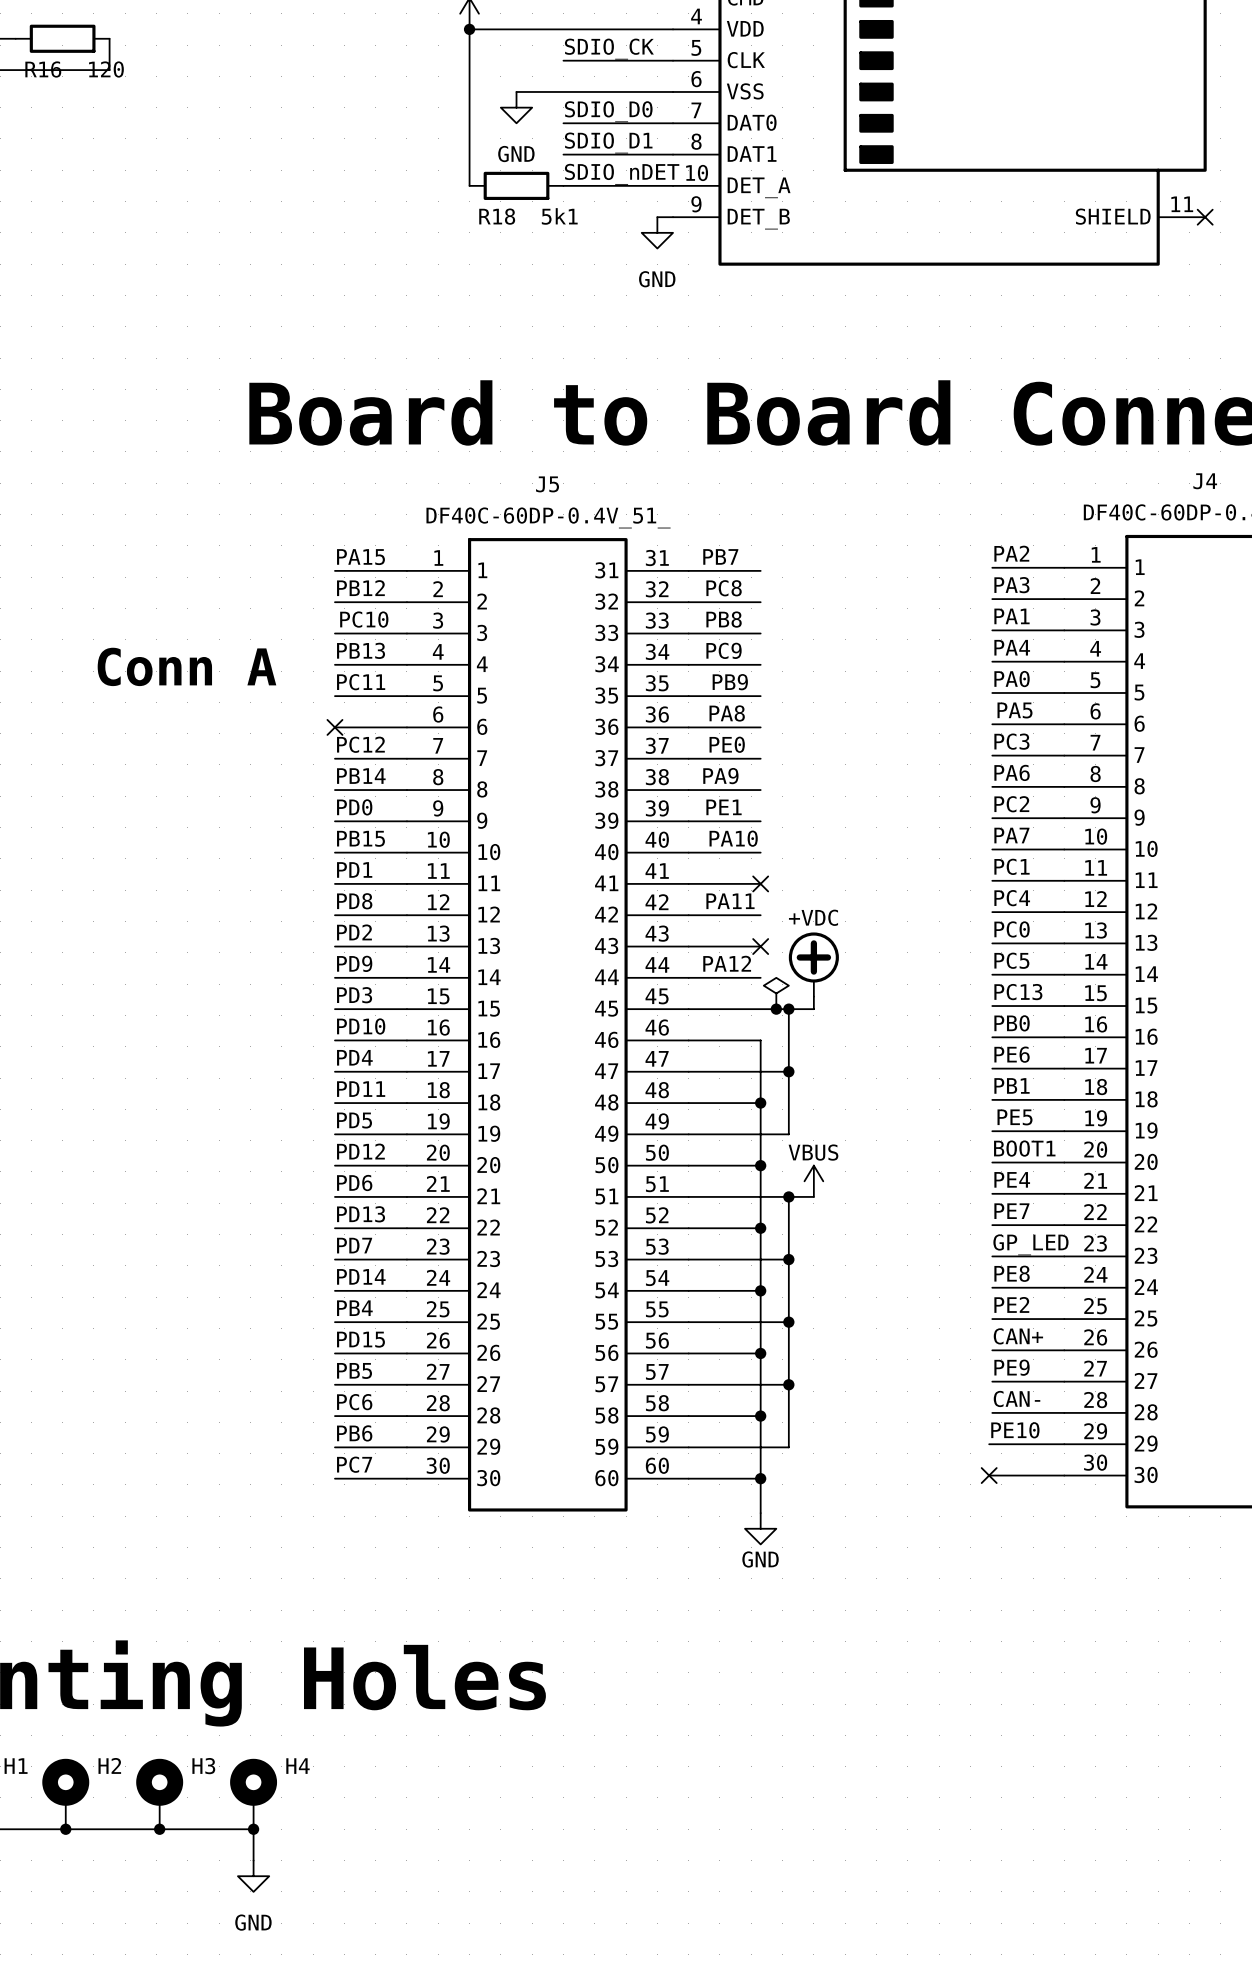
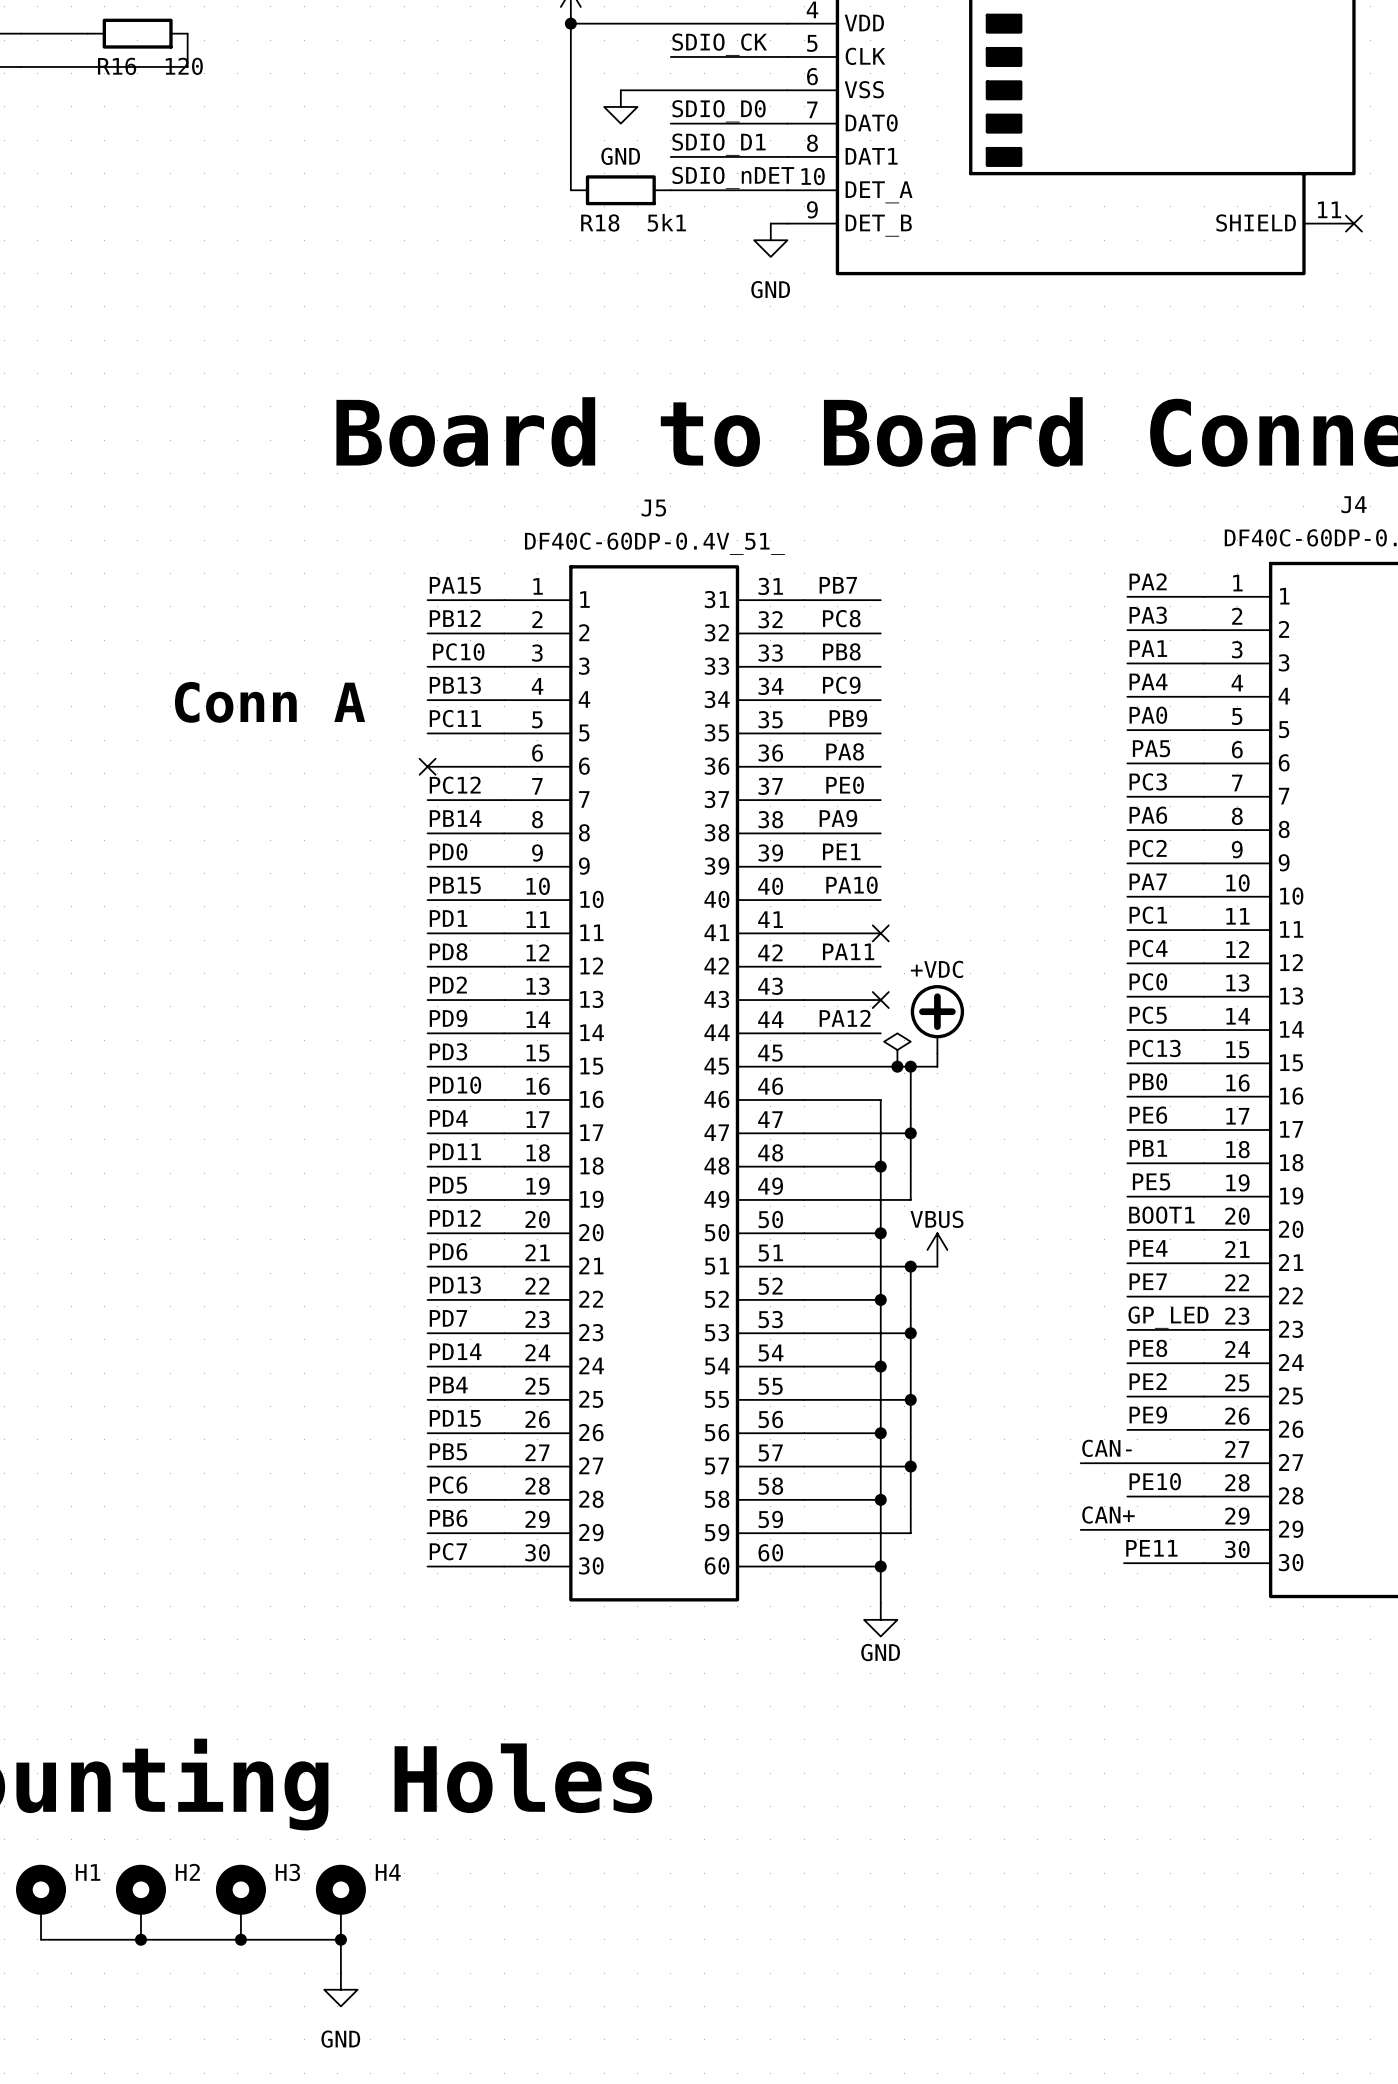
label: CAN+ (1018, 1336) -> PE9 (1148, 1415)
label: none -> CAN- (1107, 1448)
label: PE9 (1012, 1367) -> none
wire: none -> (1080, 1463) (1127, 1463)
label: CAN- (1017, 1398) -> PE10 (1155, 1481)
label: none -> CAN+ (1108, 1515)
label: PE10 (1015, 1430) -> PE11 (1151, 1548)
wire: none -> (1080, 1529) (1124, 1529)
no-connect mark: (989, 1475) -> none

